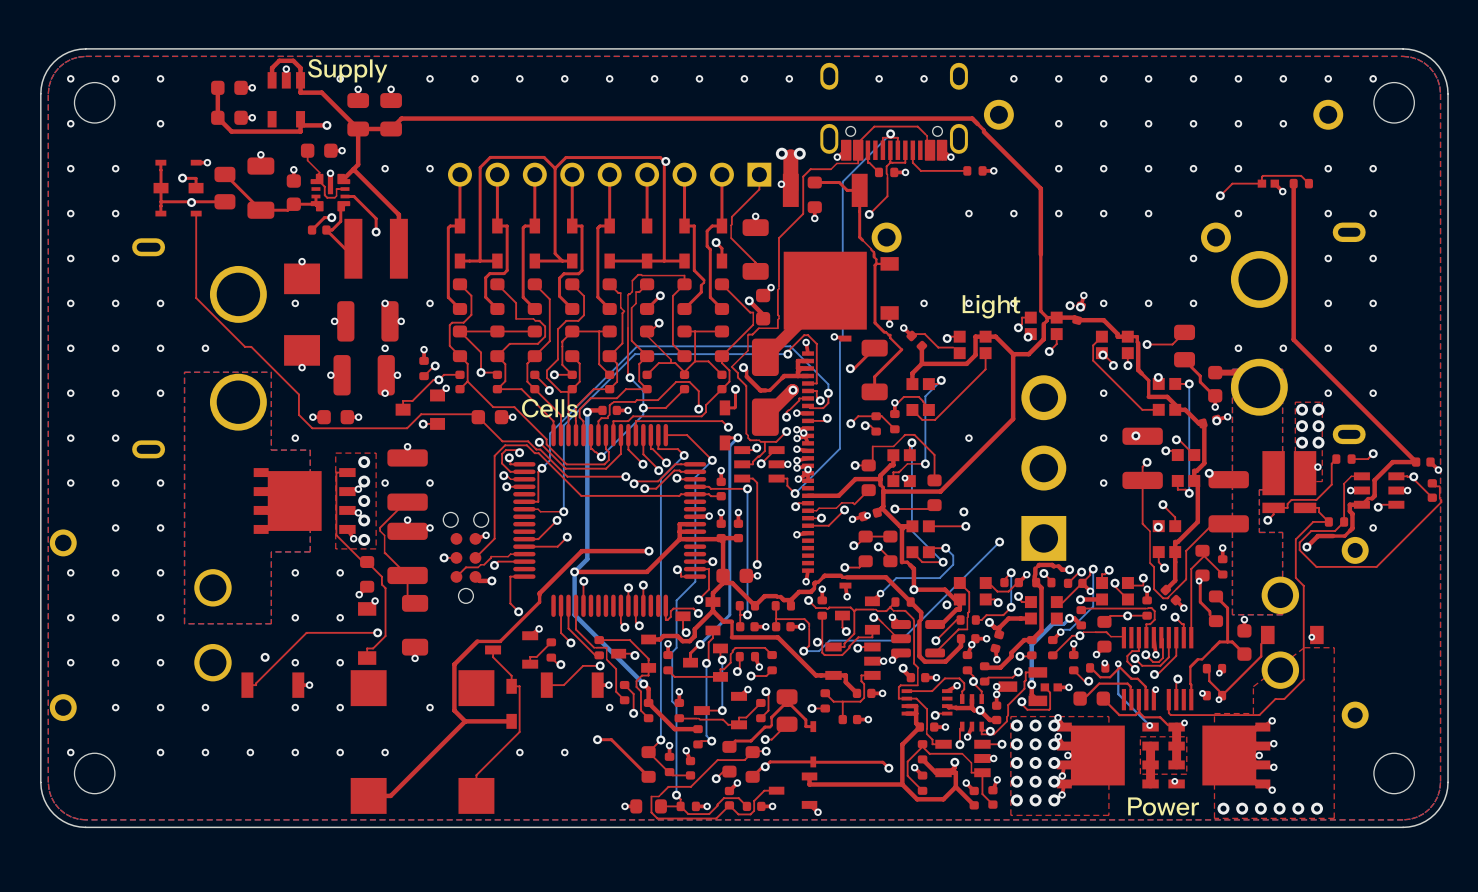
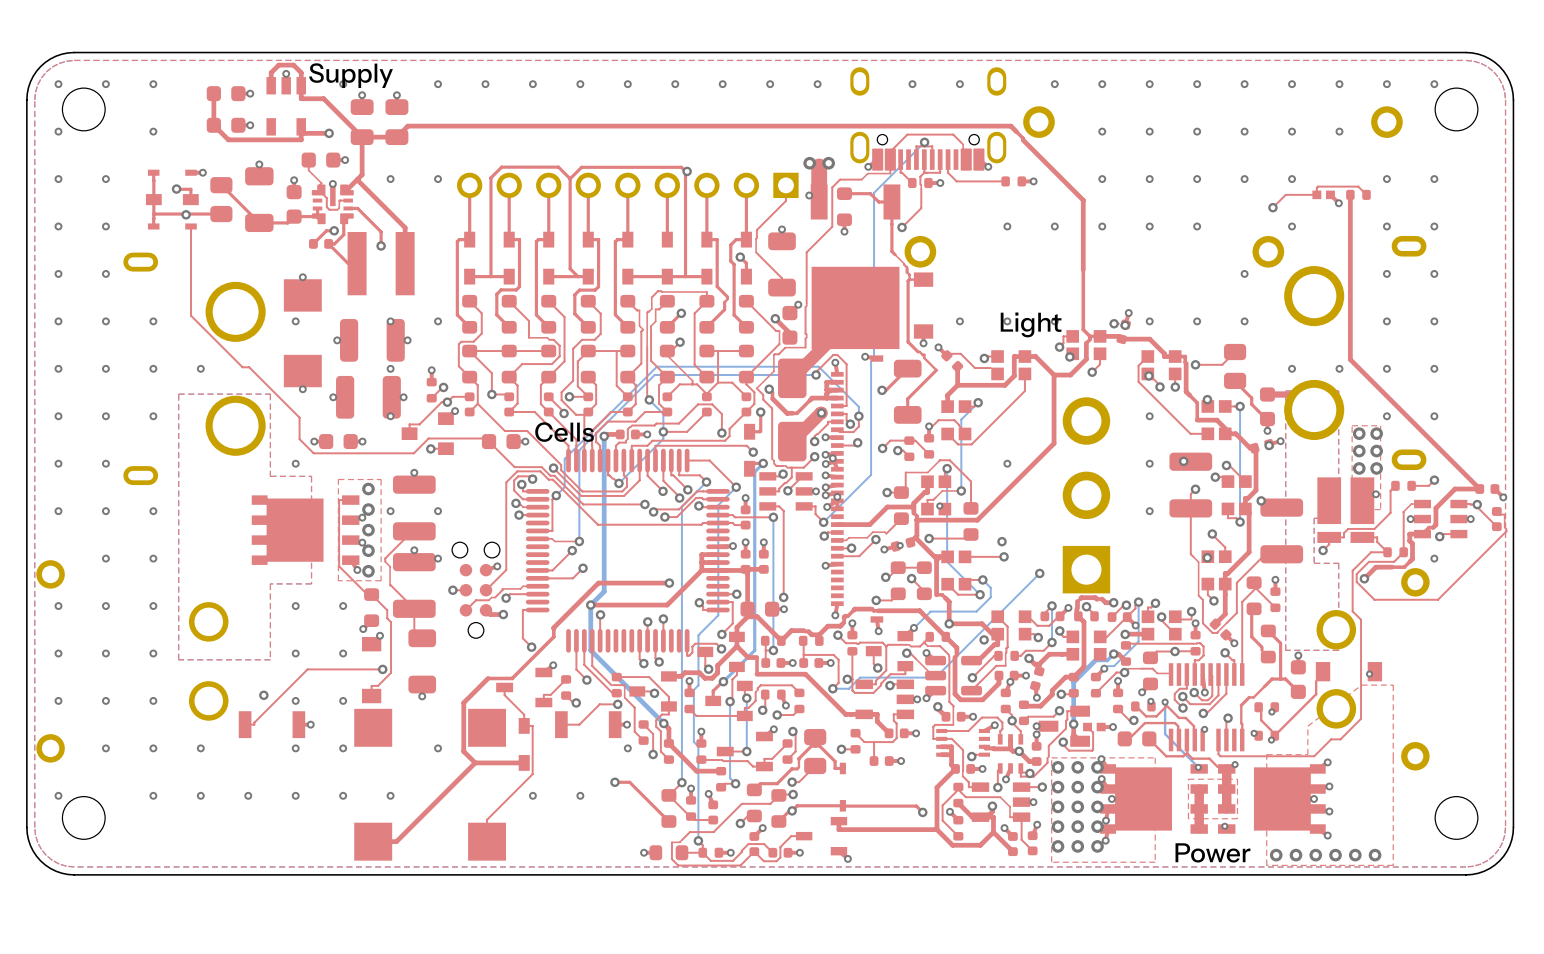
via: (1199, 581) -> none
via: (1163, 607) -> none

